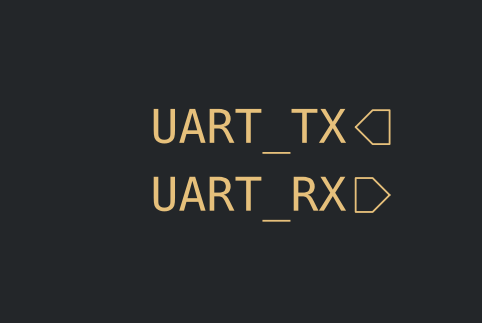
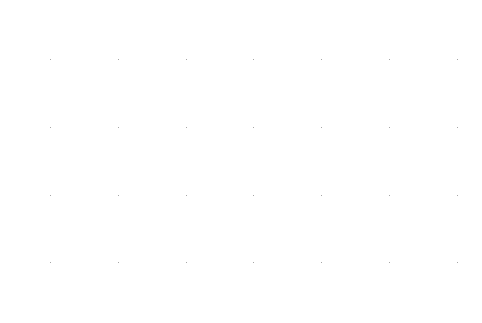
hierarchical label: UART_TX (249, 131) -> none
hierarchical label: UART_RX (249, 199) -> none

